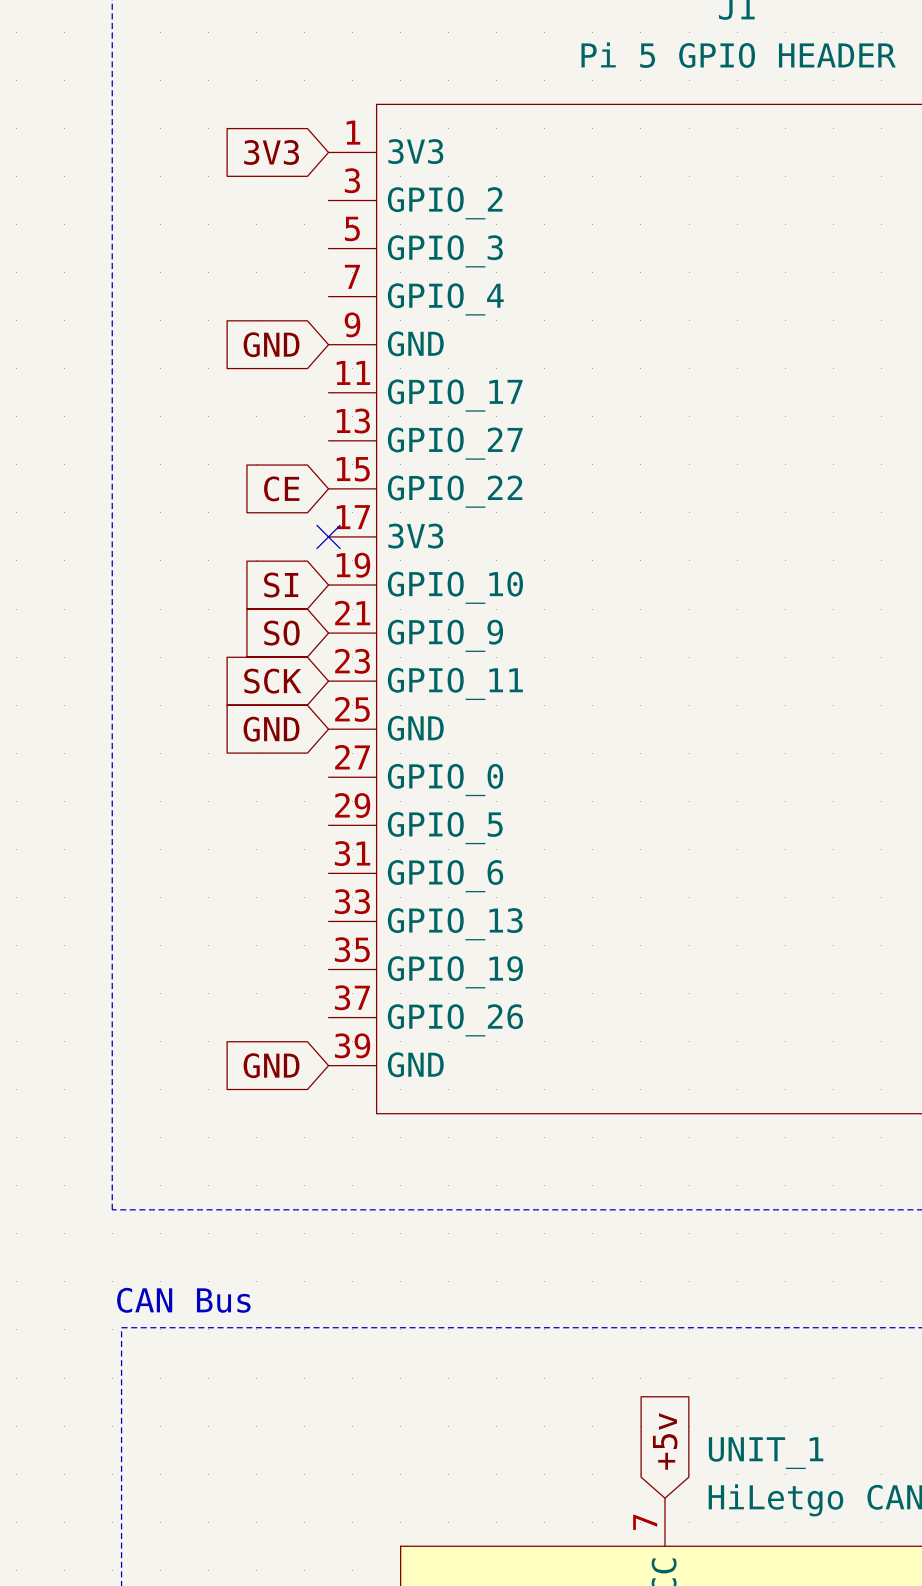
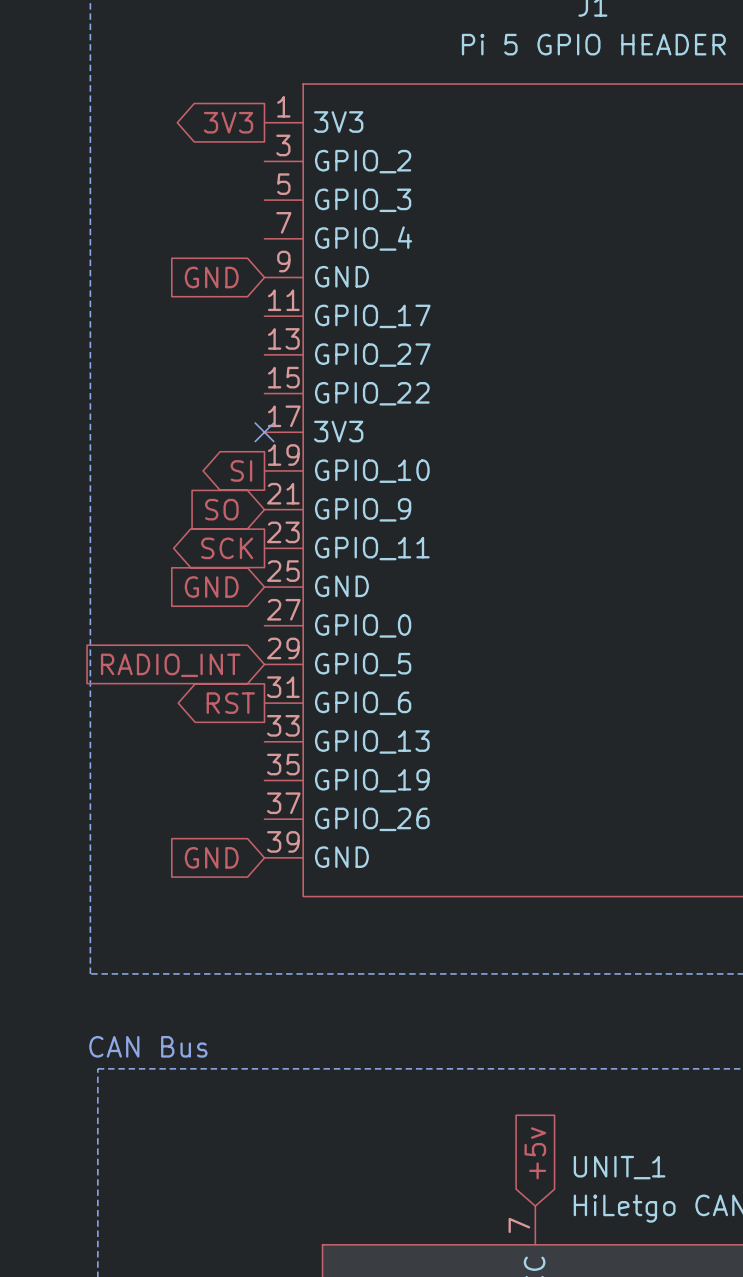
global label shape: input (271, 152) -> output (228, 122)
global label: CE (281, 488) -> none
global label shape: input (281, 585) -> output (241, 470)
global label shape: input (272, 681) -> output (227, 548)
global label: none -> RADIO_INT (170, 665)
global label: none -> RST (230, 703)

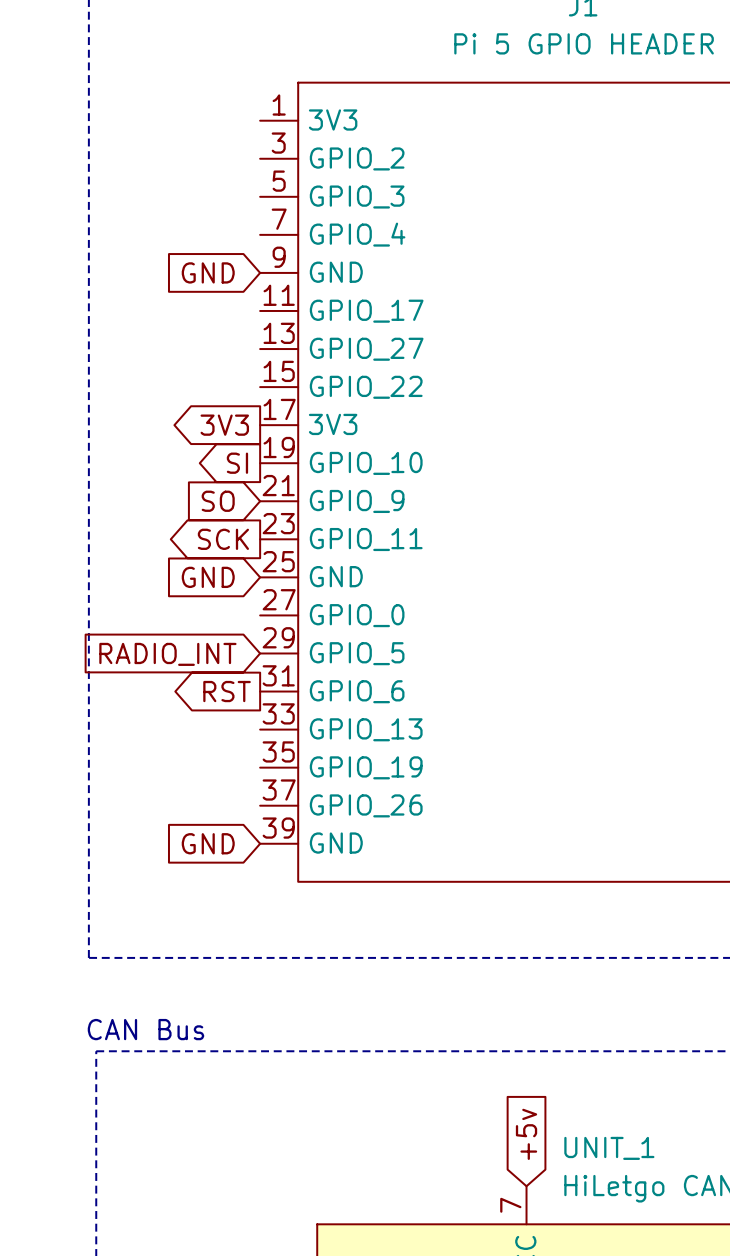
global label position: 3V3 (228, 122) -> 3V3 (224, 425)
no-connect mark: (264, 432) -> none

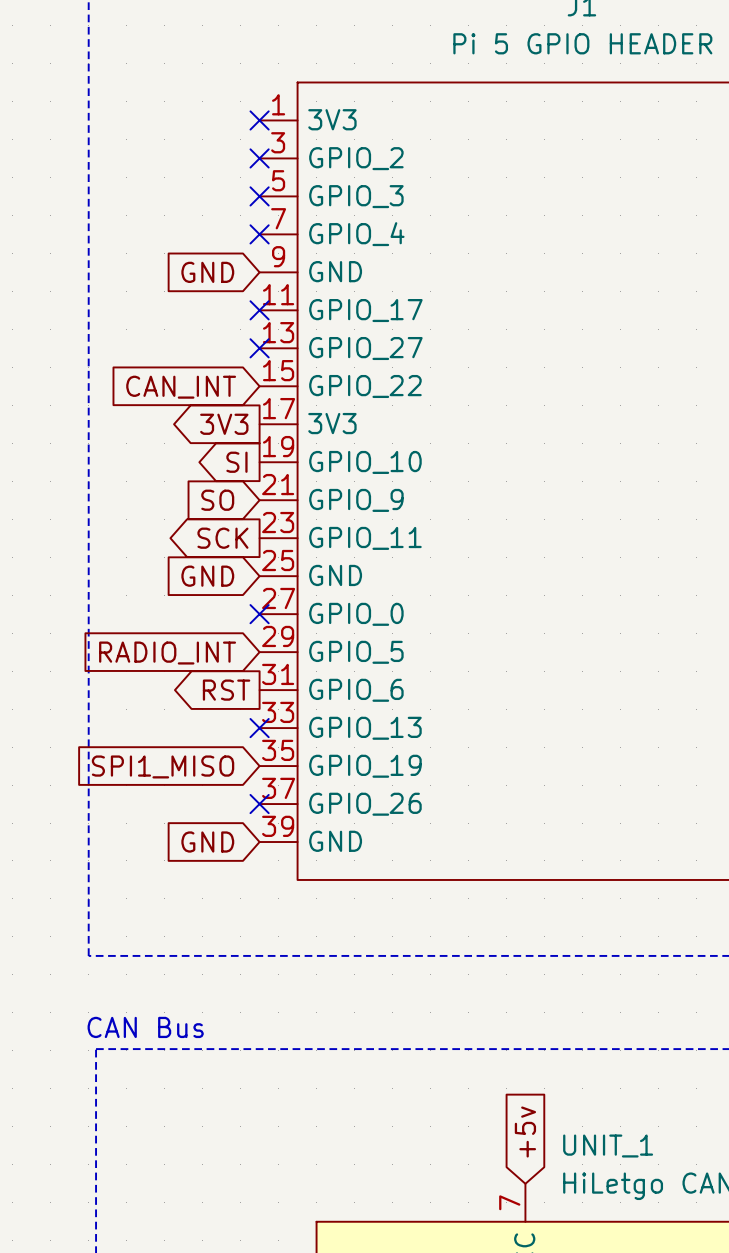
no-connect mark: none -> (259, 120)
no-connect mark: none -> (259, 158)
no-connect mark: none -> (259, 196)
no-connect mark: none -> (259, 234)
no-connect mark: none -> (259, 310)
no-connect mark: none -> (259, 348)
global label: none -> CAN_INT (181, 387)
no-connect mark: none -> (259, 614)
no-connect mark: none -> (259, 728)
global label: none -> SPI1_MISO (163, 766)
no-connect mark: none -> (259, 804)

